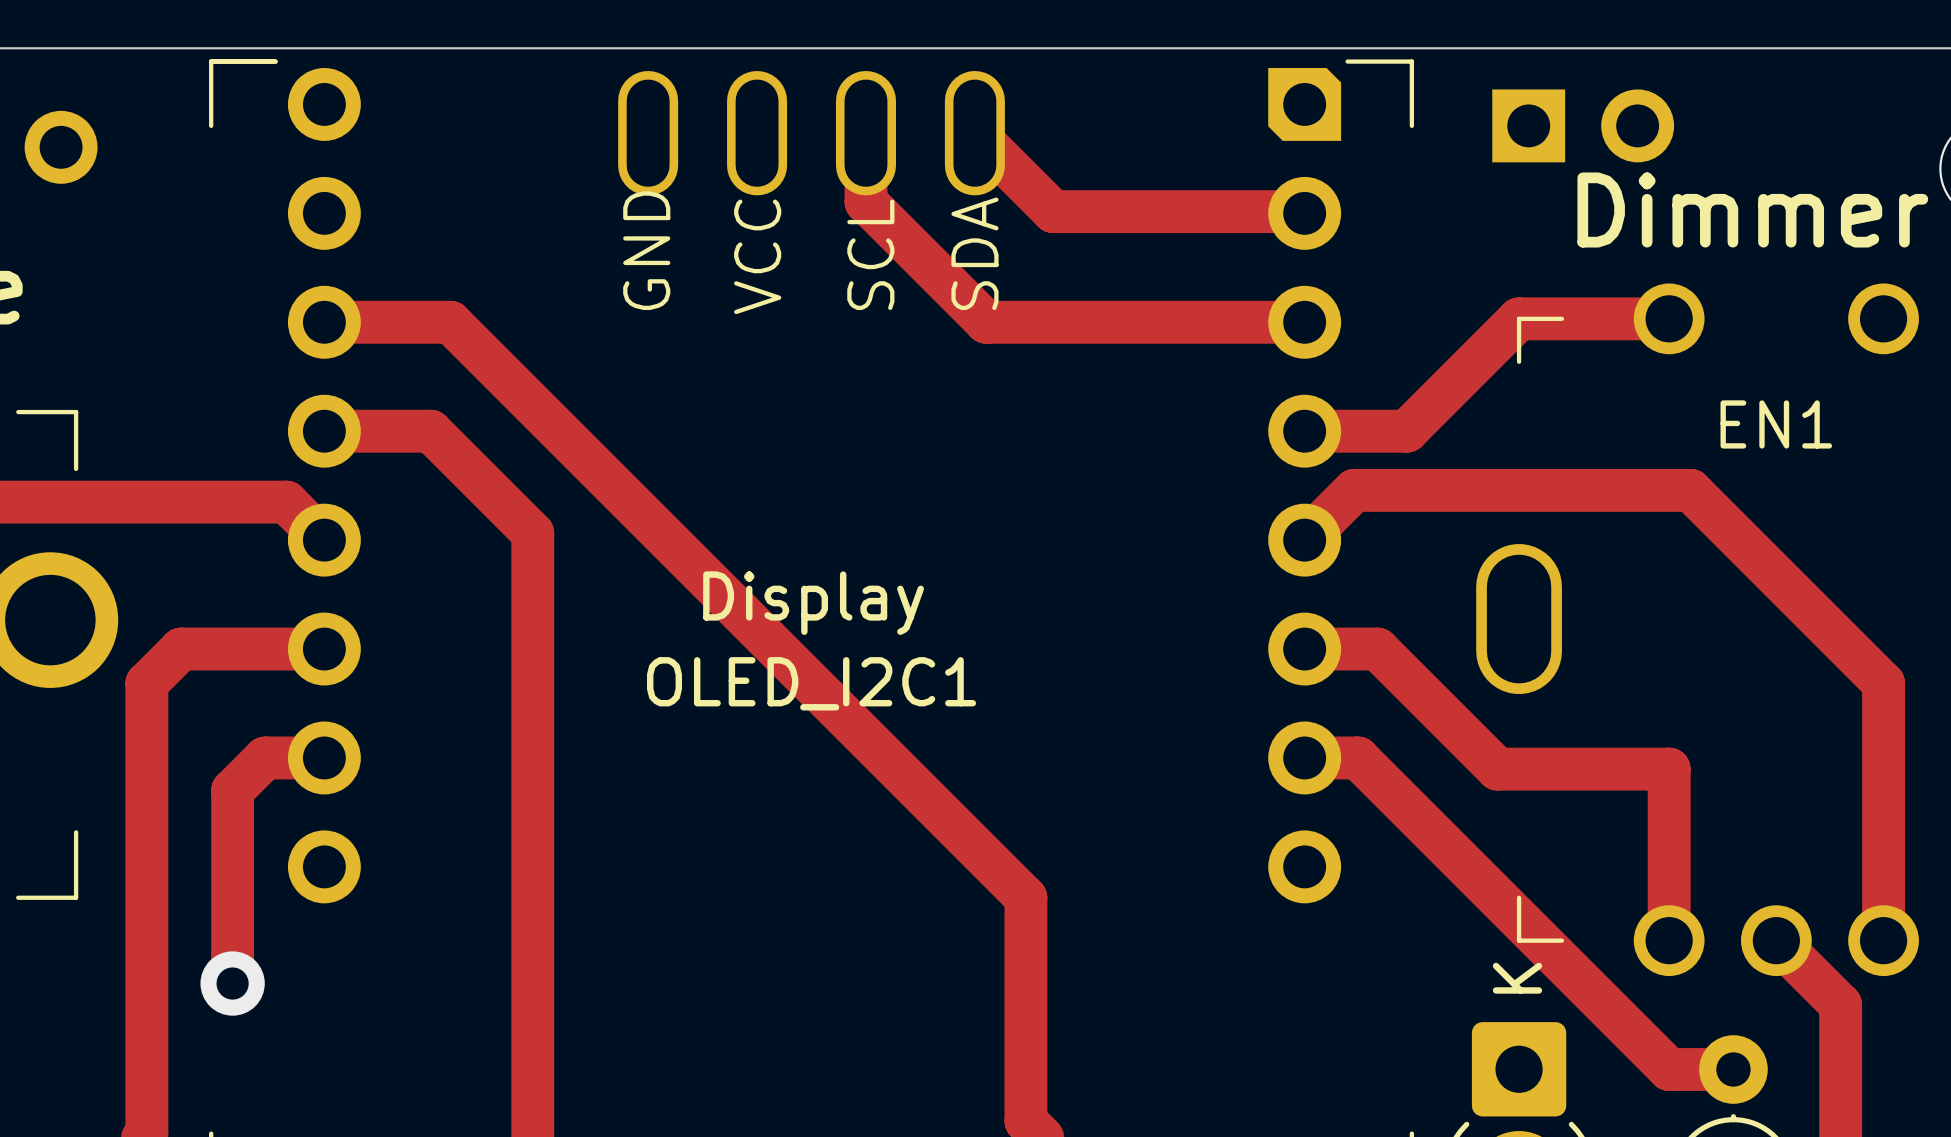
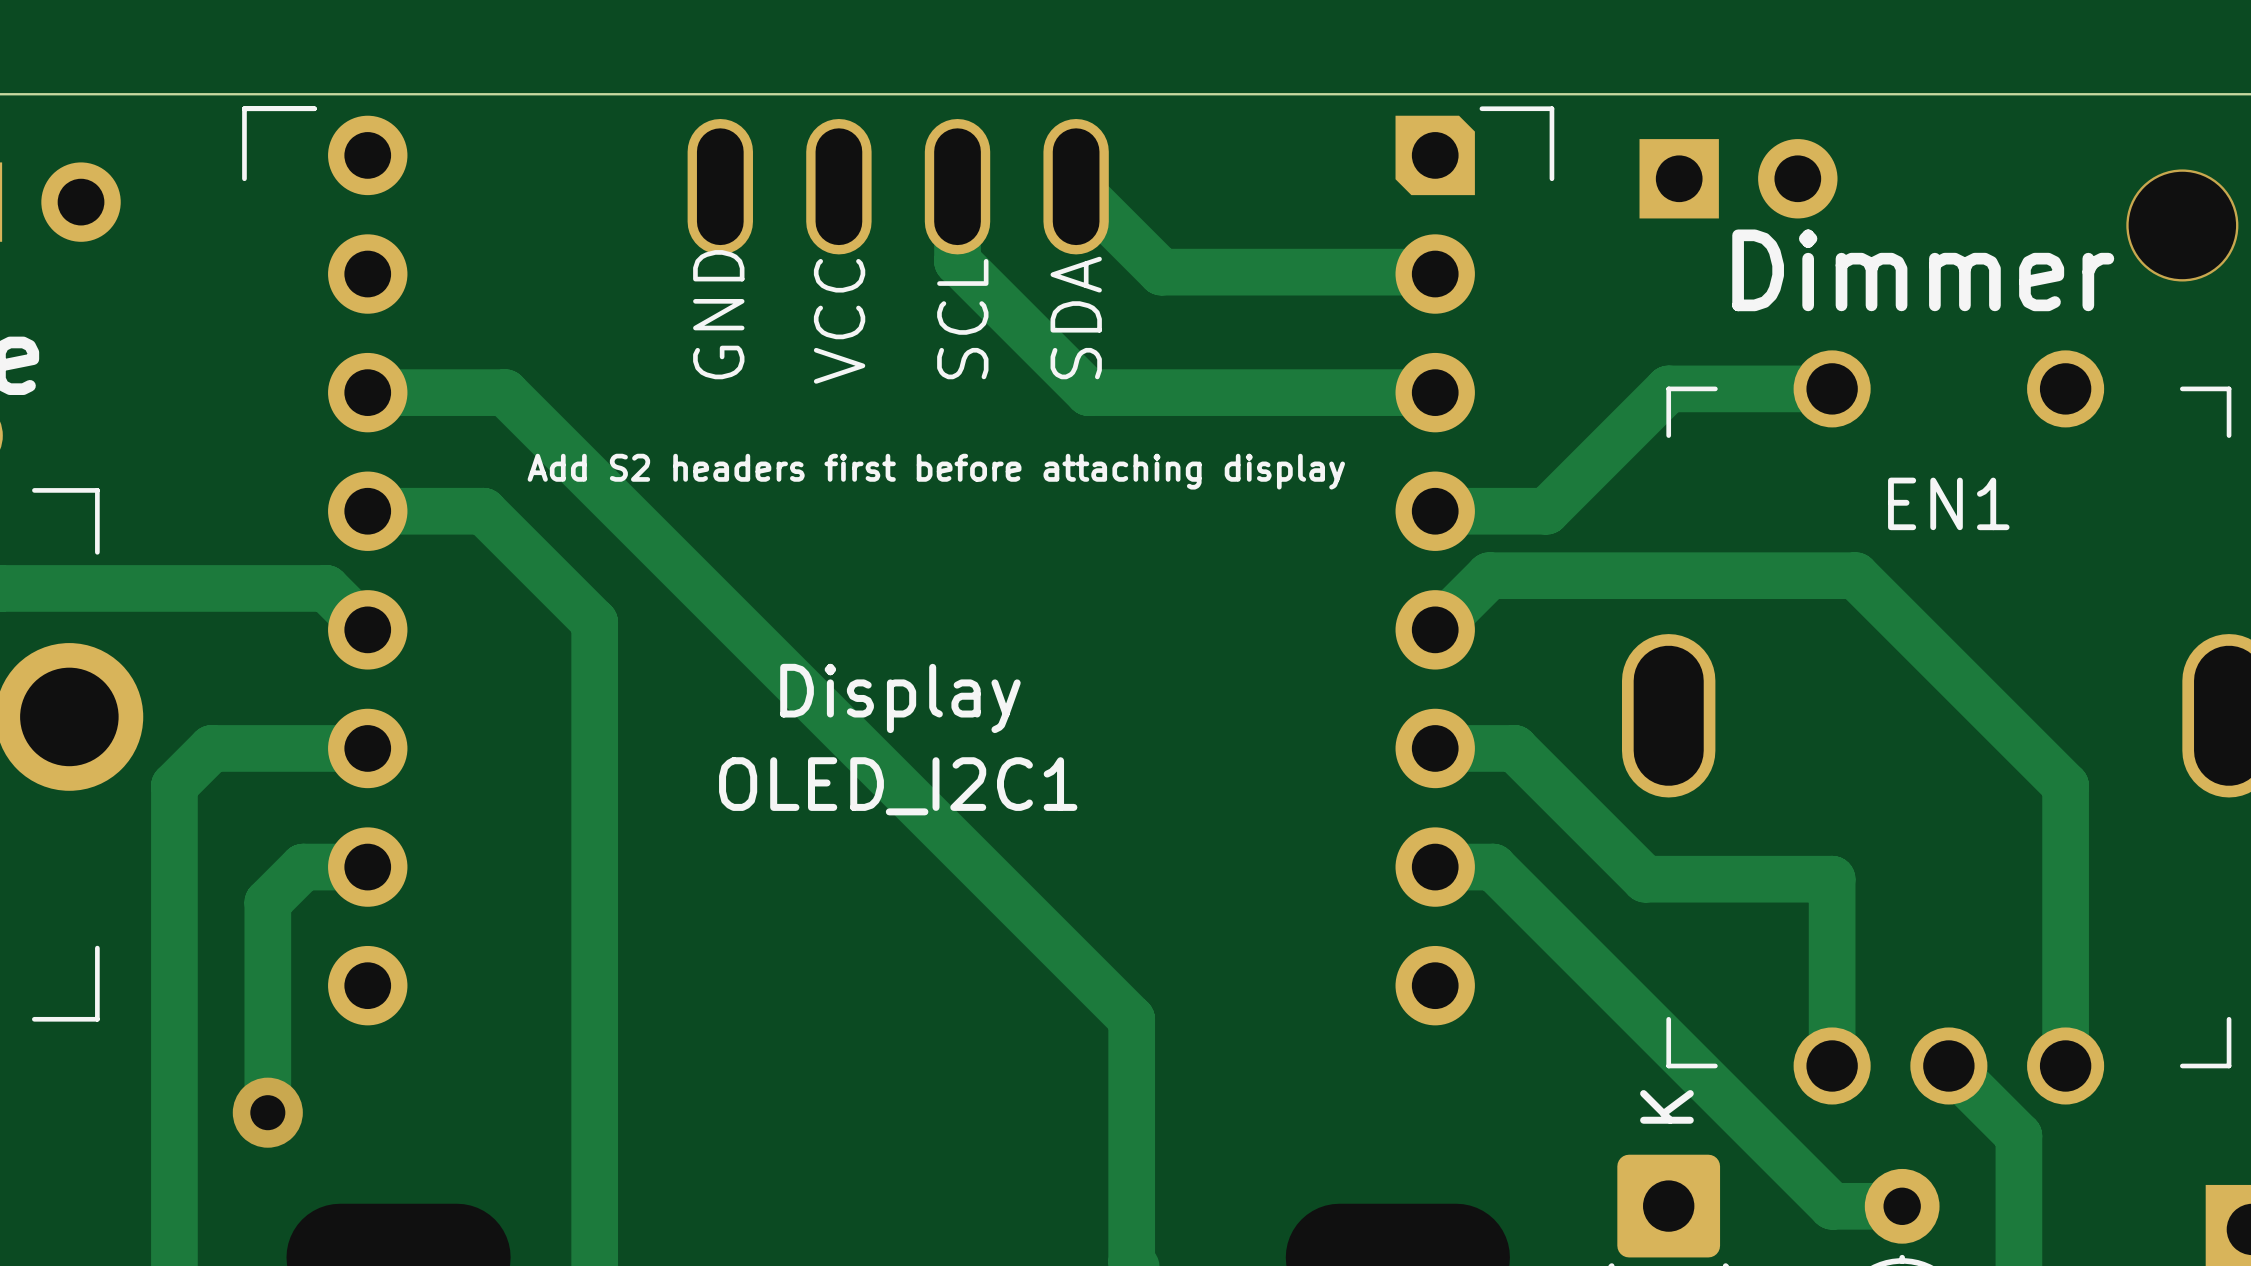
text: none -> Add S2 headers first before attaching display (936, 471)

